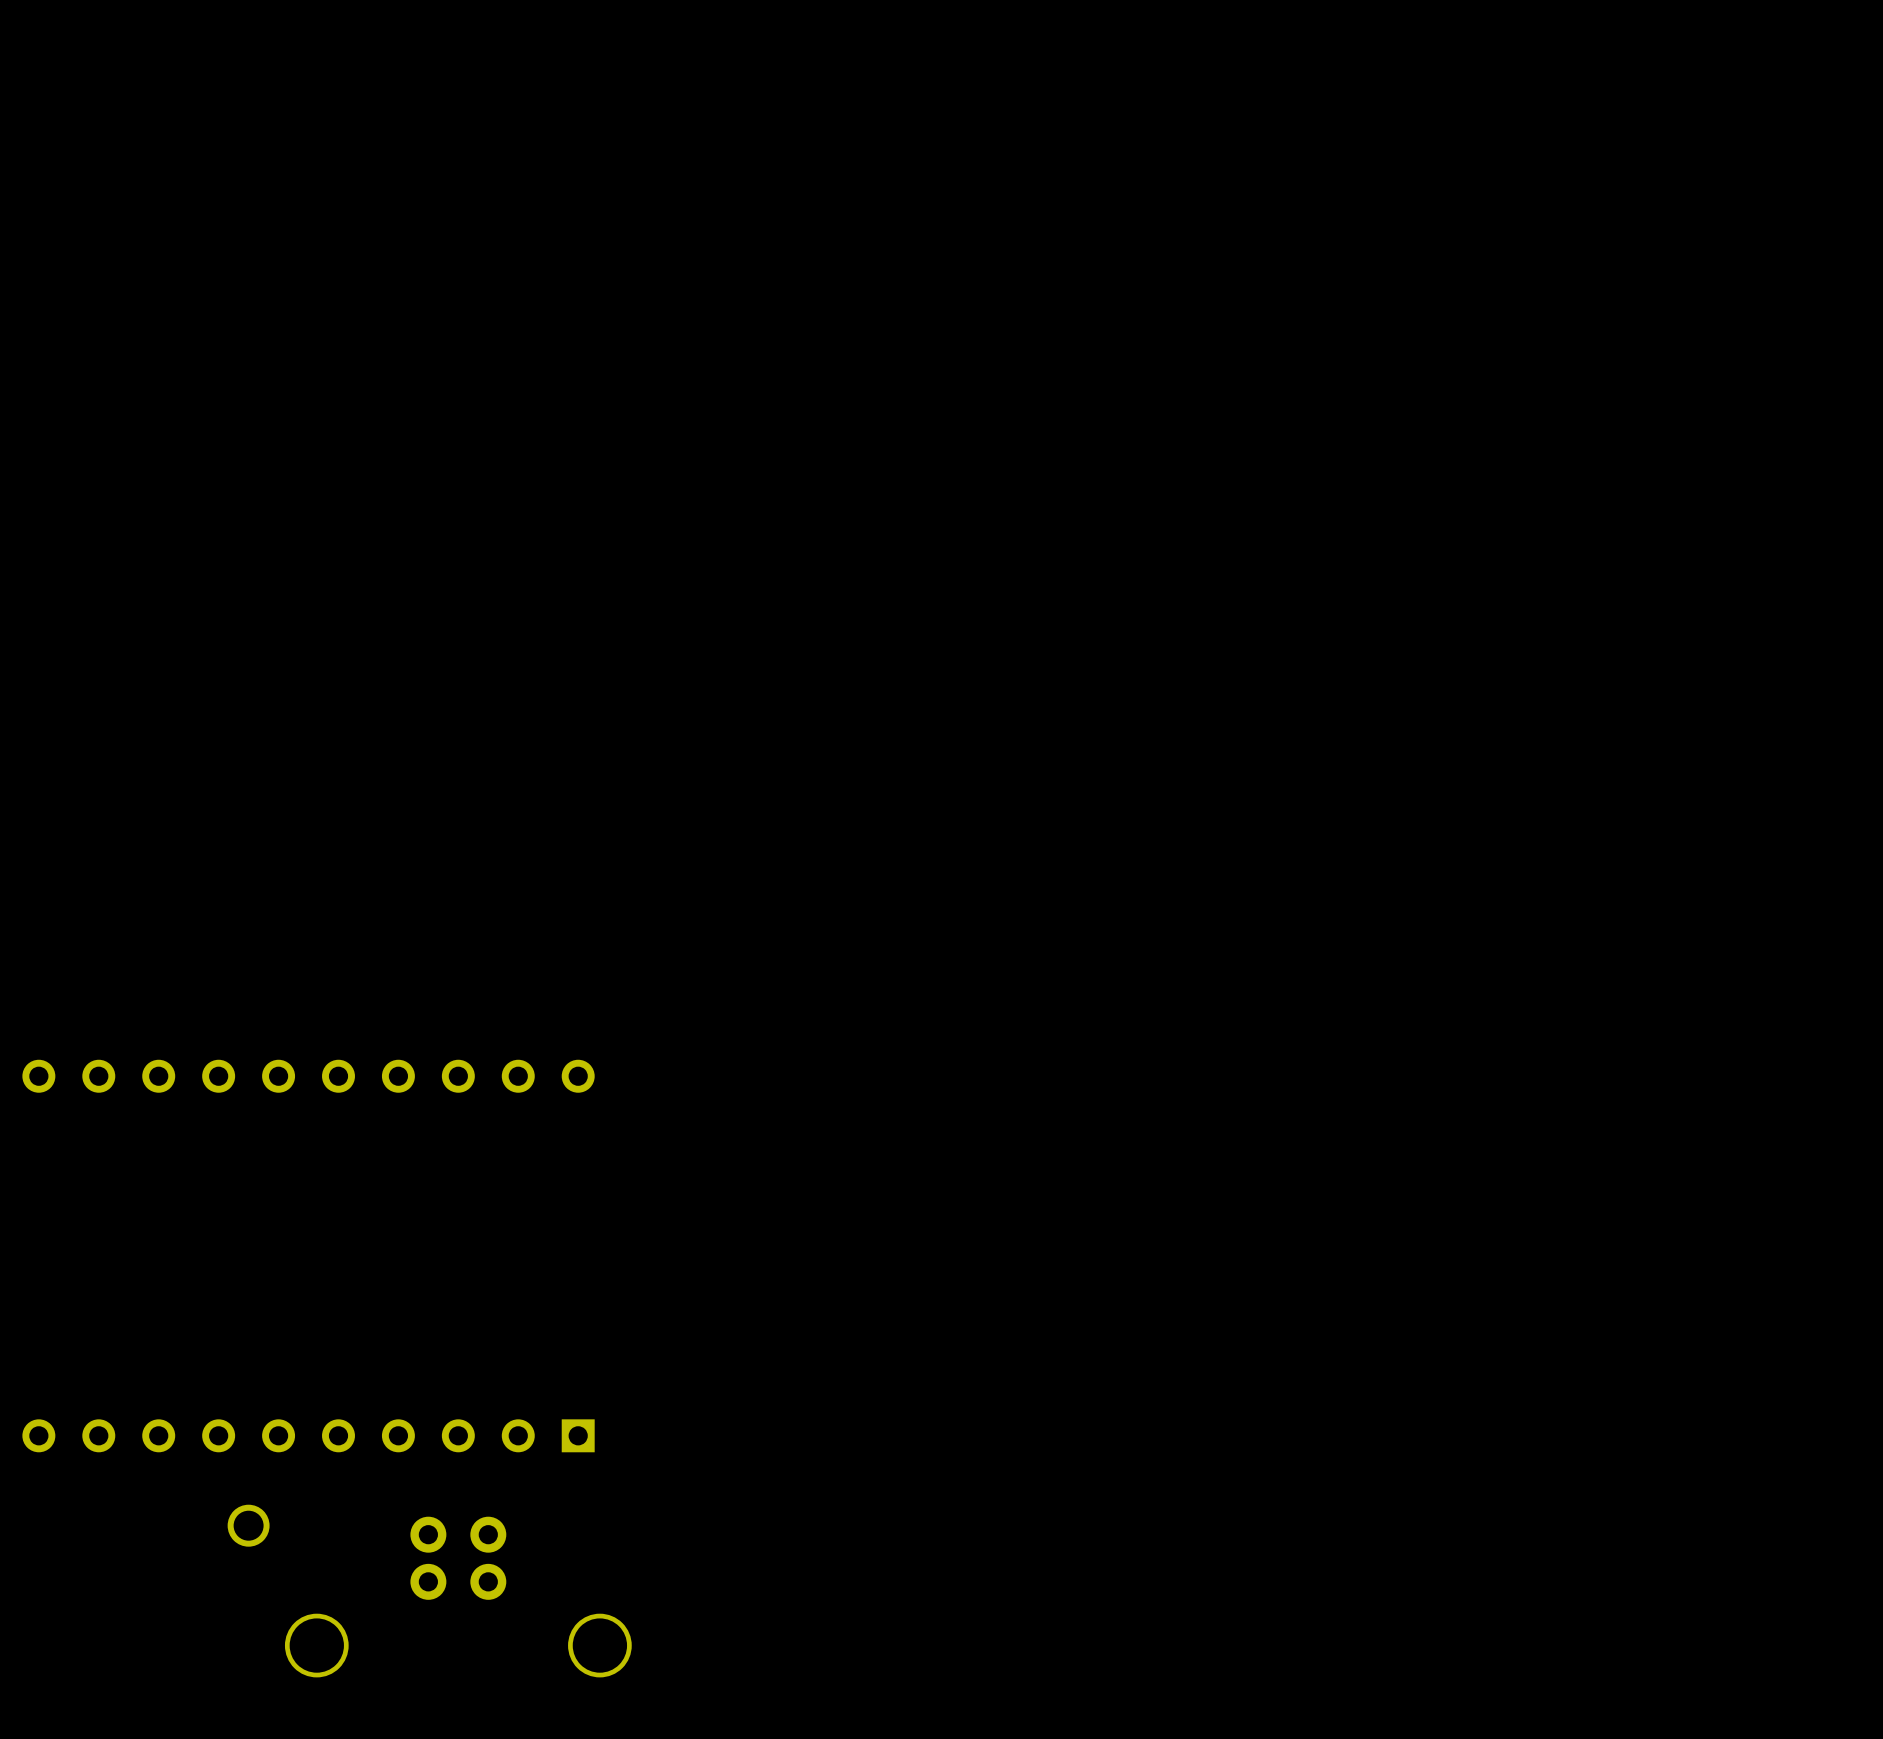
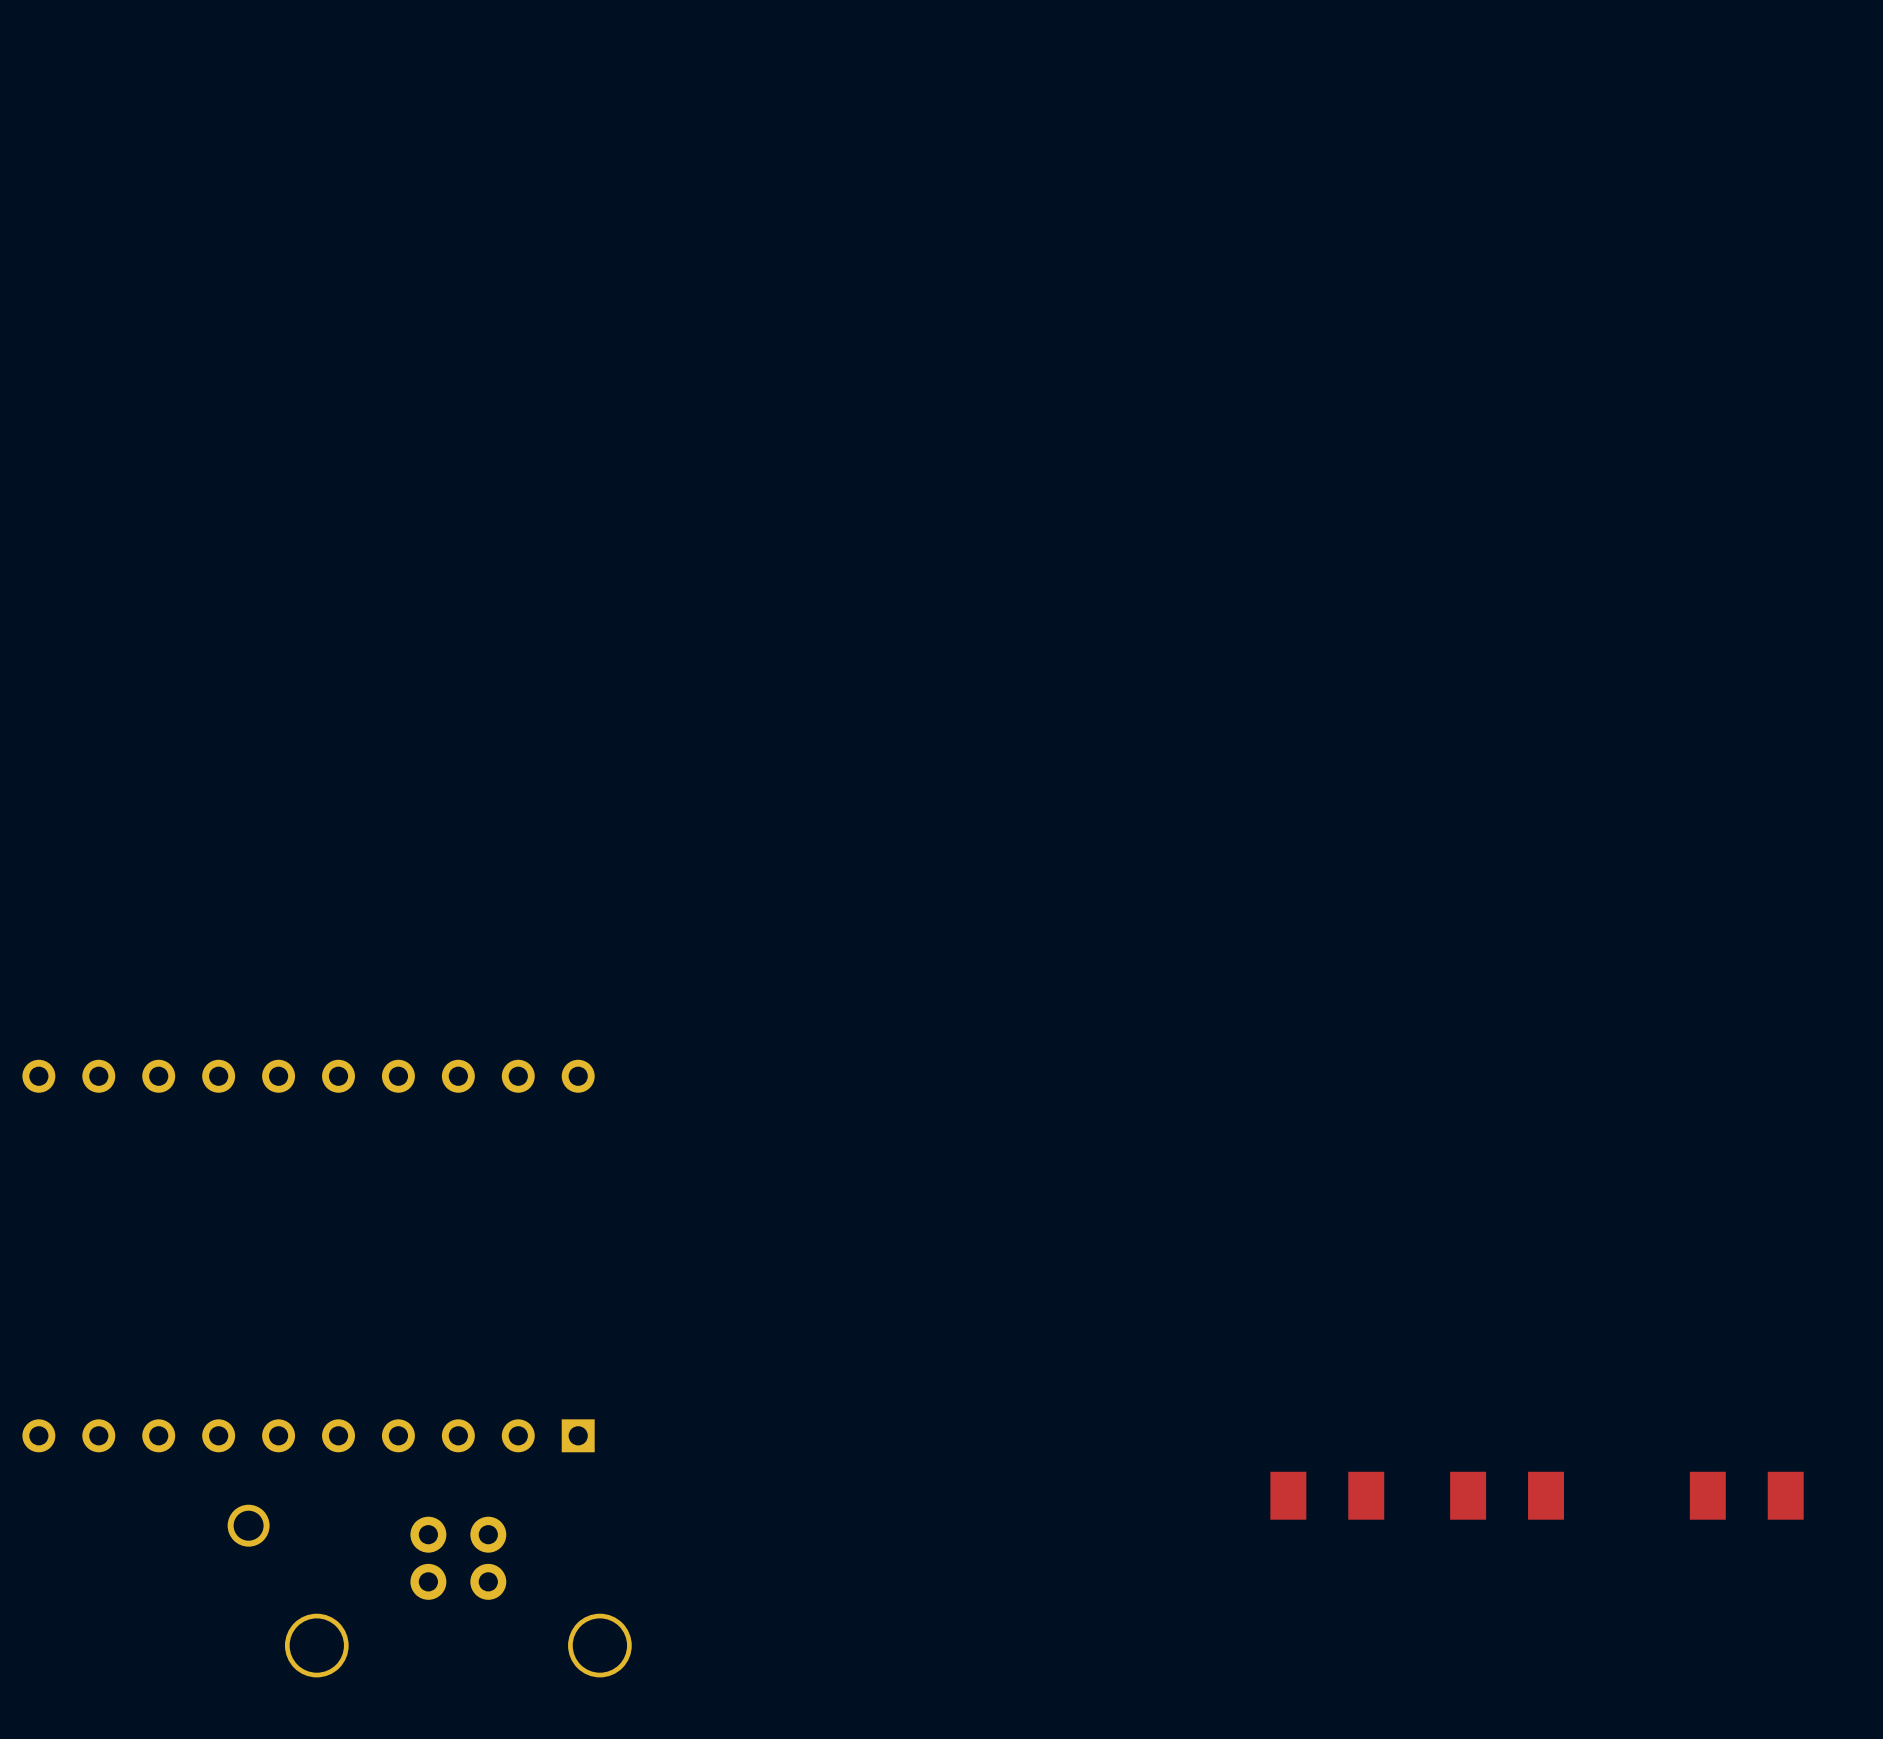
part: none -> (1327, 1495)
part: none -> (1507, 1495)
part: none -> (1746, 1495)

